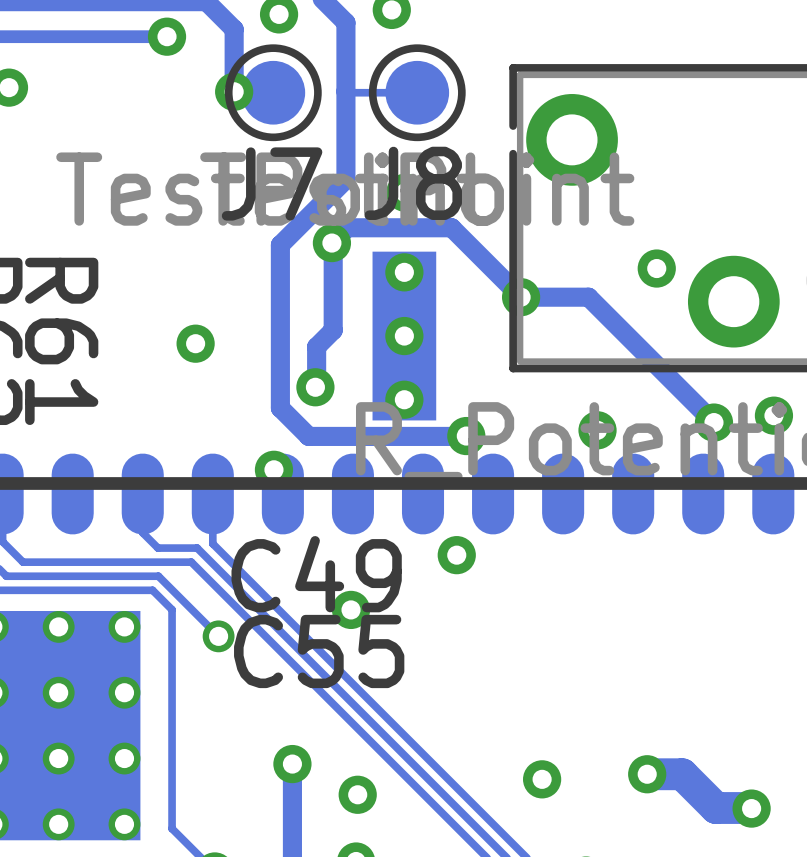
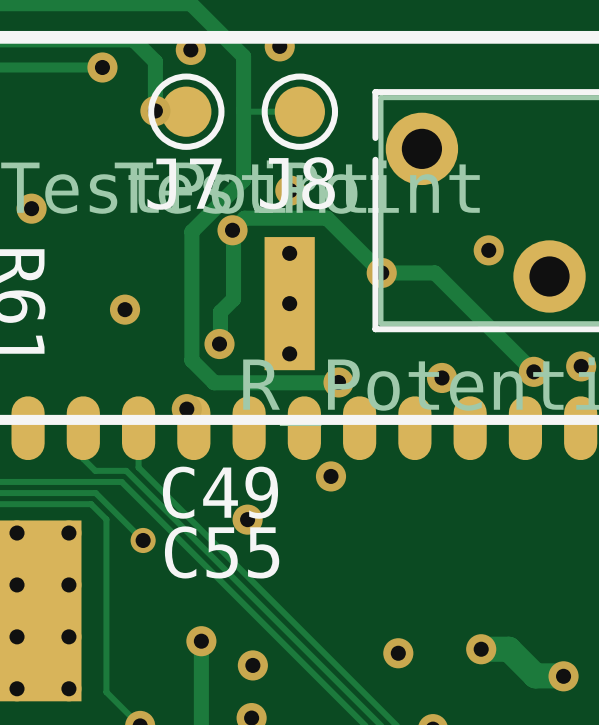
via: none -> (31, 208)

